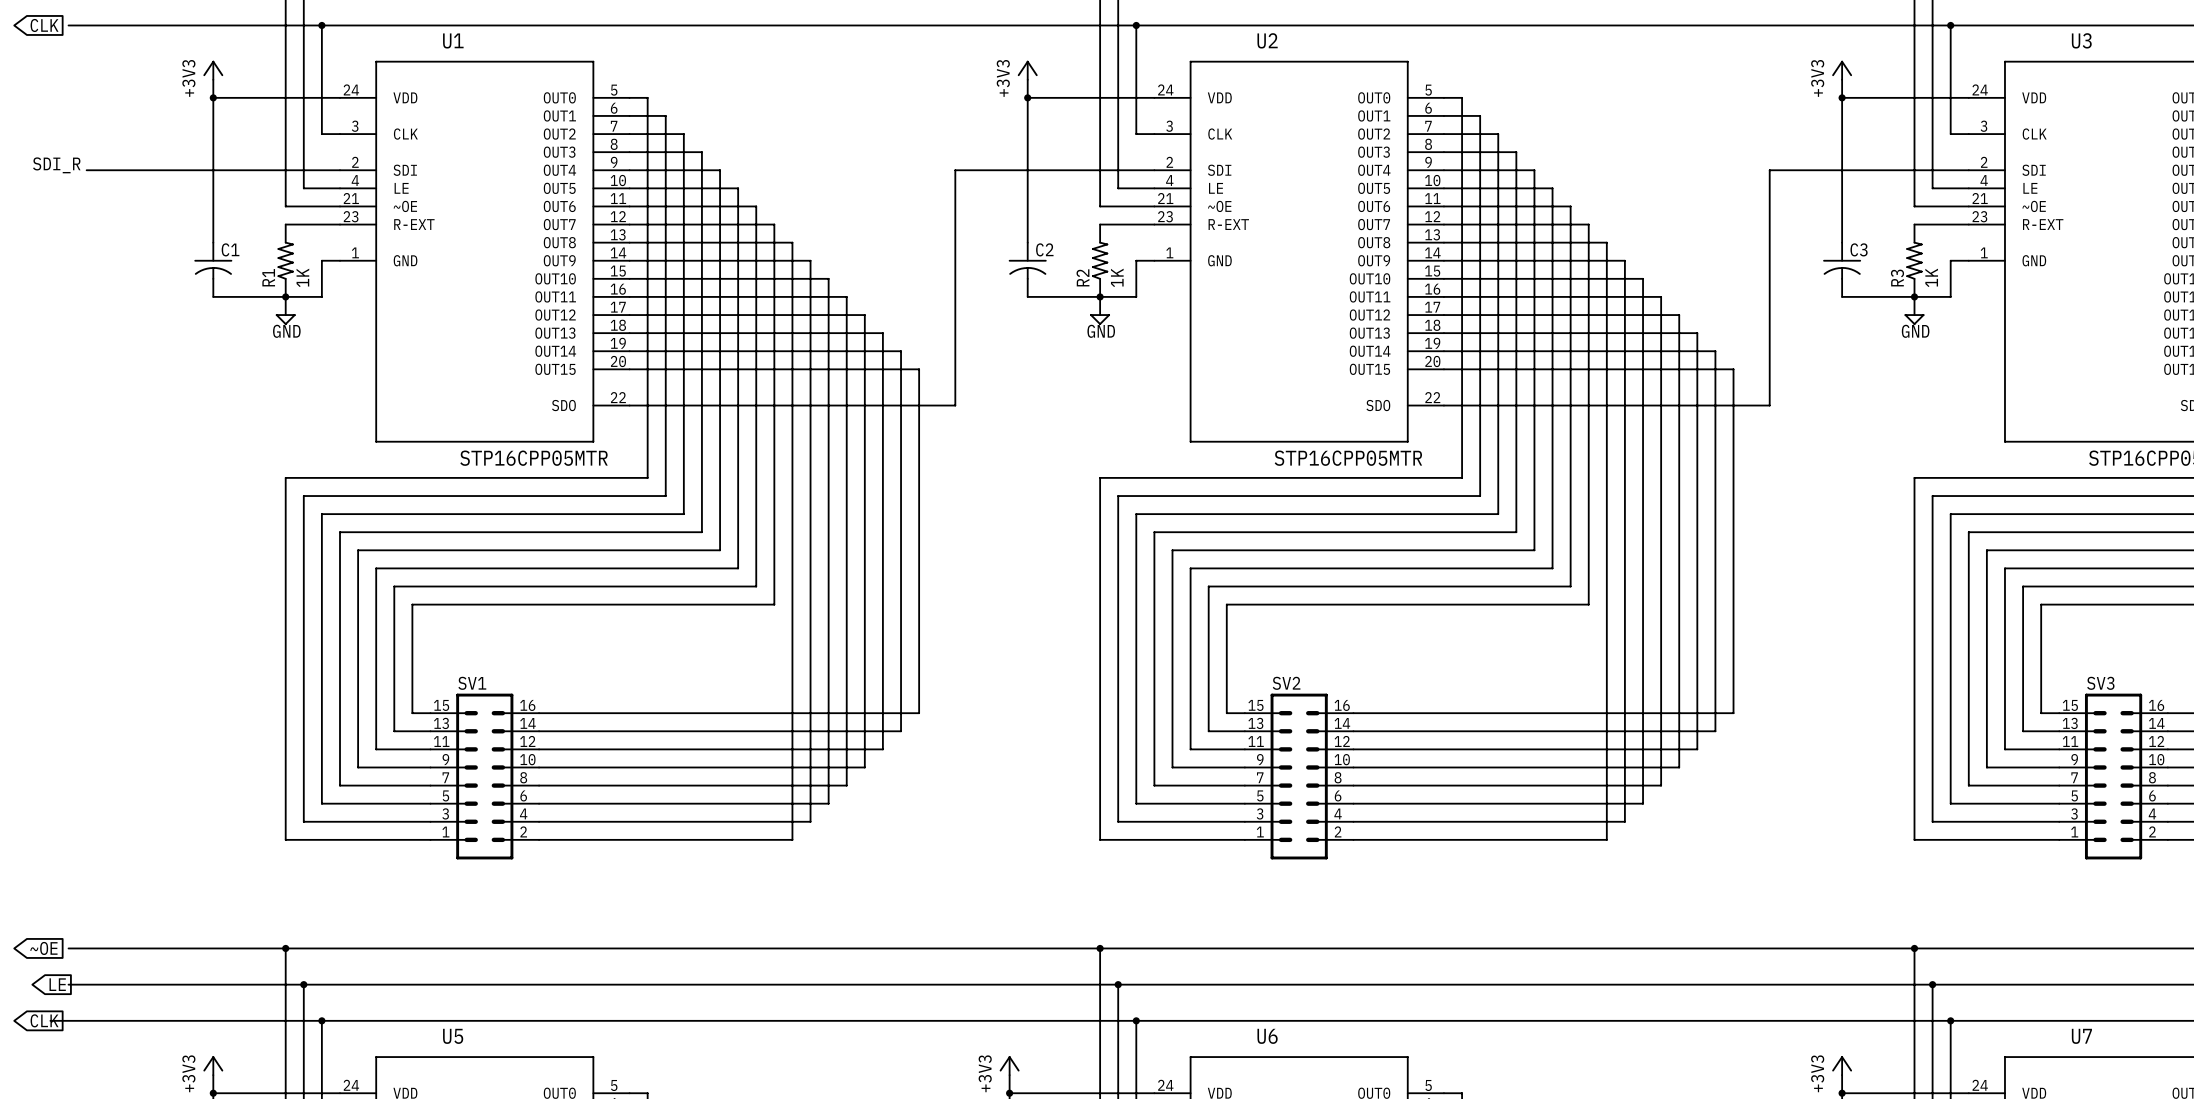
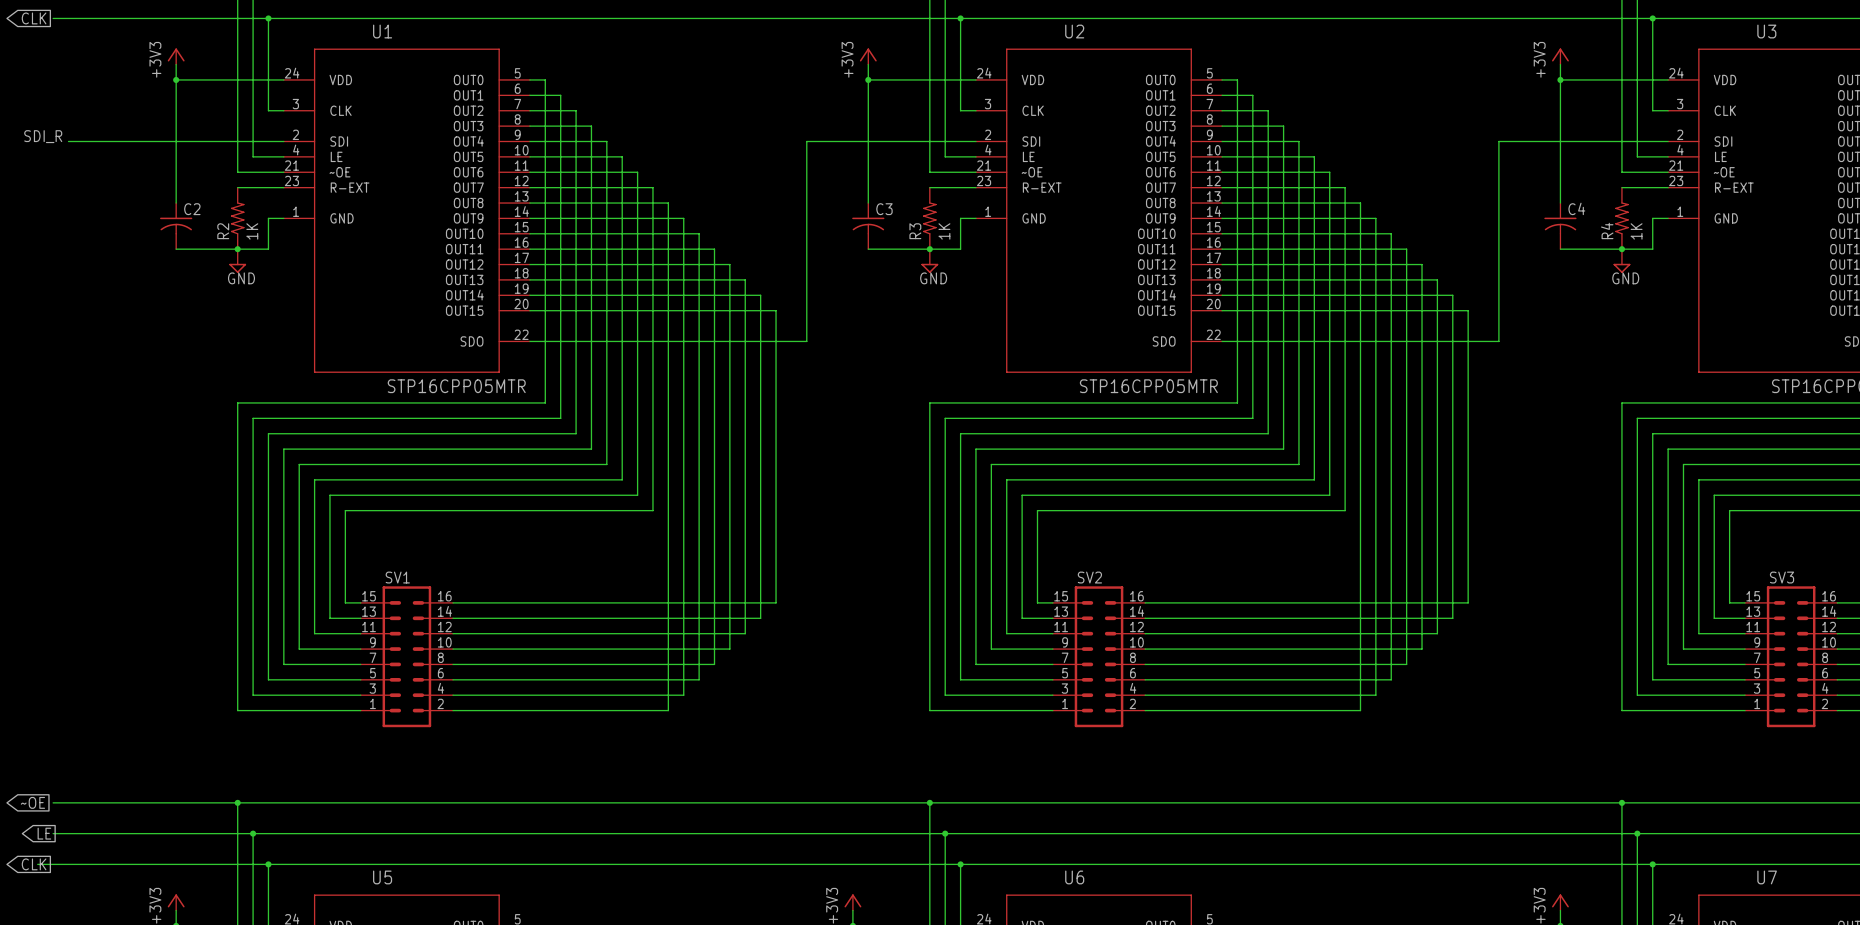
C1 name: C1 (230, 249) -> C2 (192, 209)
C2 name: C2 (1044, 249) -> C3 (884, 209)
C3 name: C3 (1859, 249) -> C4 (1576, 208)
R1 name: R1 (268, 277) -> R2 (223, 231)
R2 name: R2 (1082, 277) -> R3 (915, 231)
R3 name: R3 (1897, 278) -> R4 (1607, 230)

